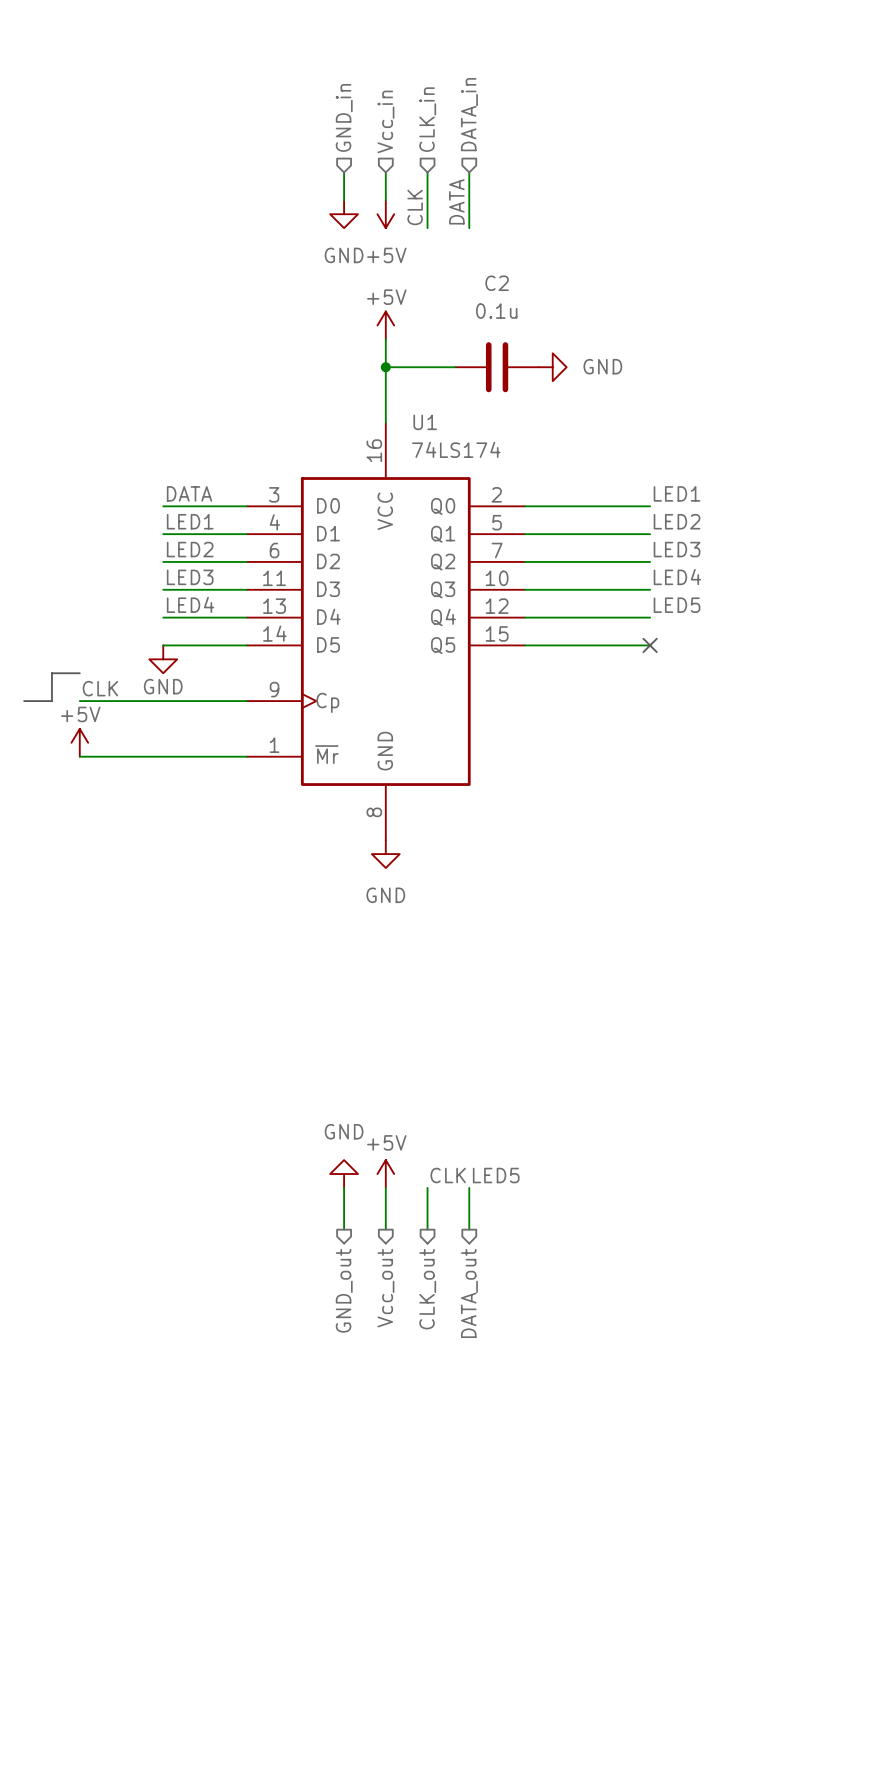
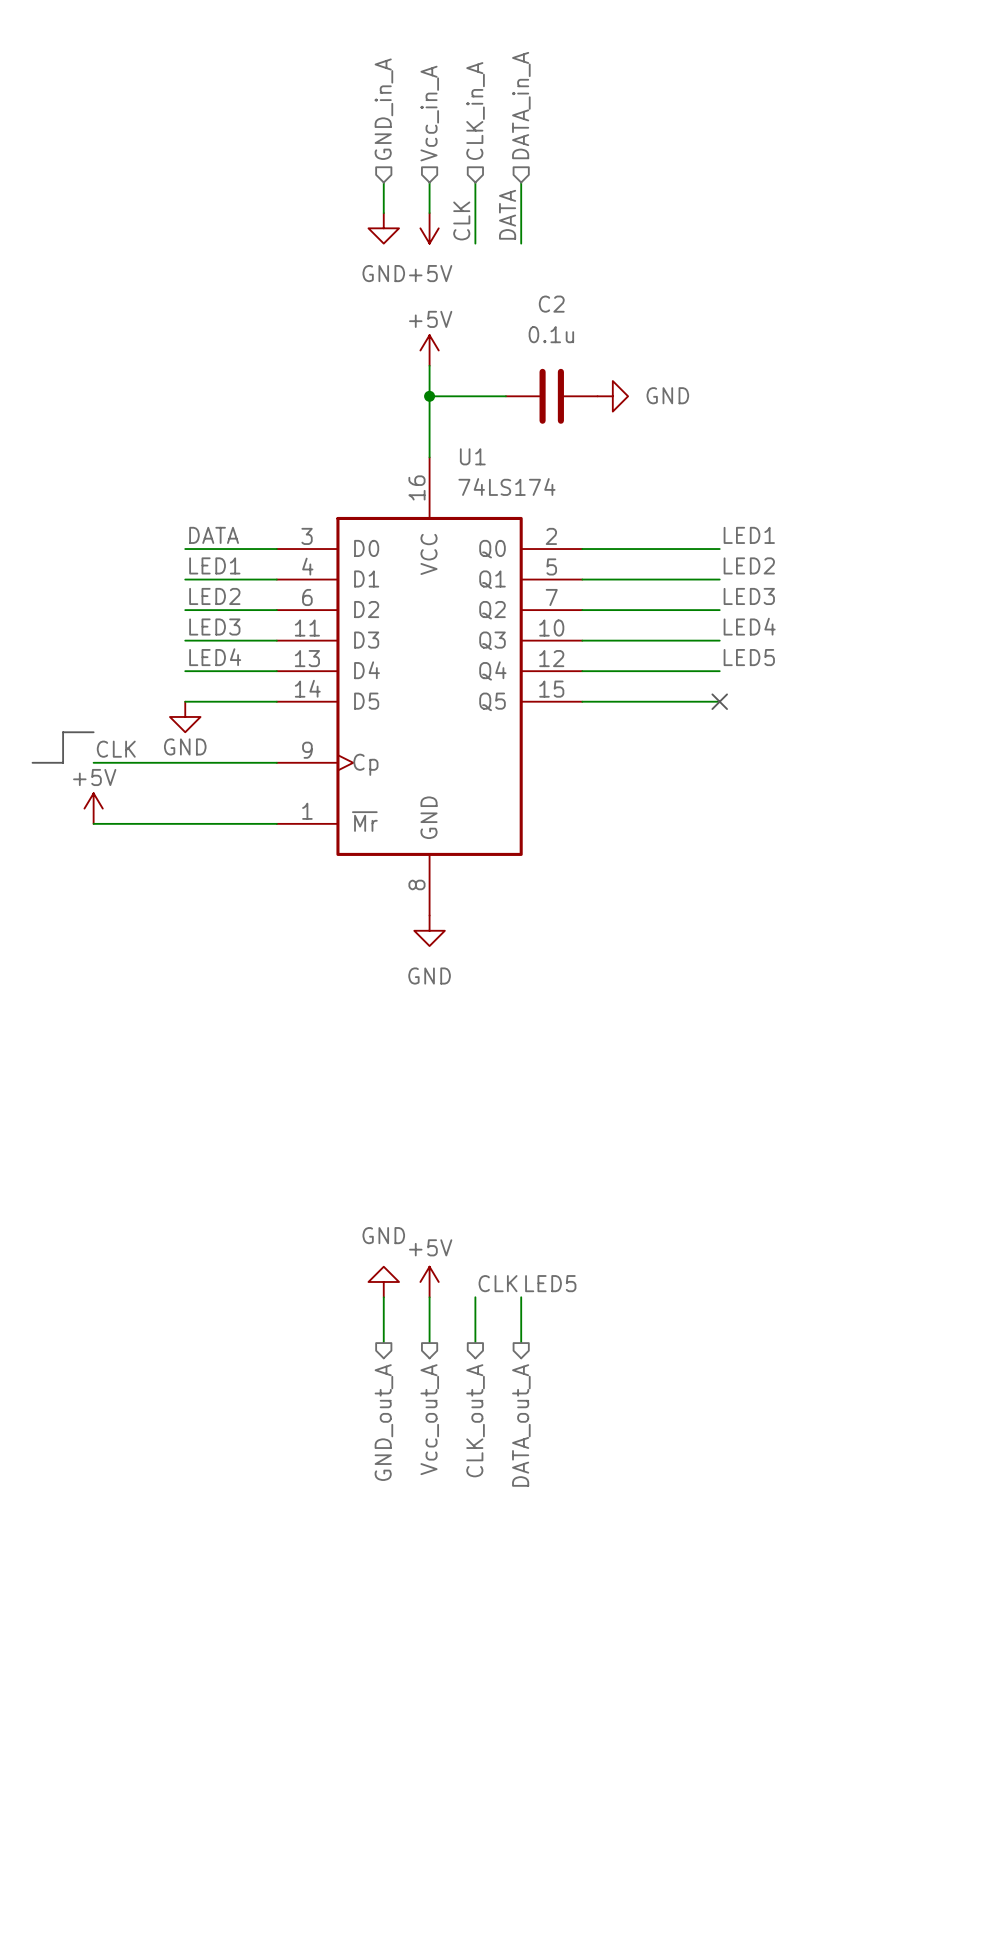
hierarchical label: DATA_in (469, 114) -> DATA_in_A (521, 105)
hierarchical label: GND_in (344, 117) -> GND_in_A (383, 109)
hierarchical label: CLK_in (427, 119) -> CLK_in_A (475, 111)
hierarchical label: Vcc_in (385, 121) -> Vcc_in_A (429, 113)
hierarchical label: Vcc_out (385, 1288) -> Vcc_out_A (429, 1419)
hierarchical label: CLK_out (427, 1289) -> CLK_out_A (475, 1420)
hierarchical label: GND_out (344, 1290) -> GND_out_A (383, 1422)
hierarchical label: DATA_out (469, 1293) -> DATA_out_A (521, 1425)

